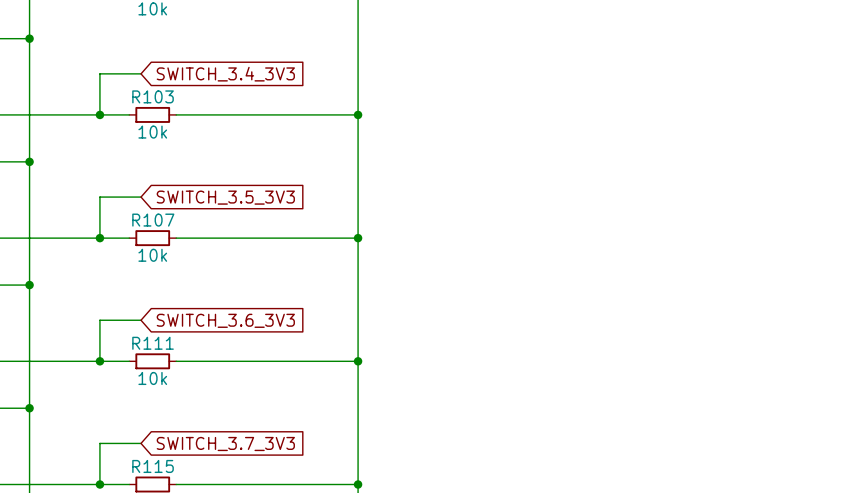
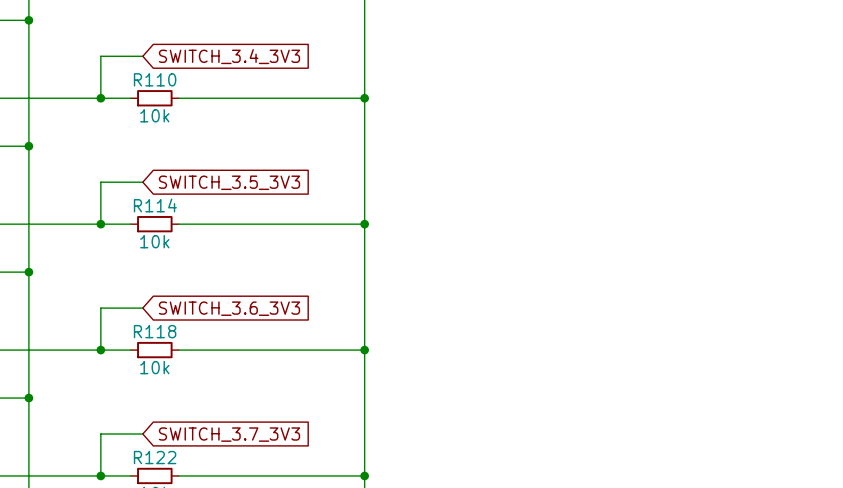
R103 name: R103 (153, 96) -> R110 (155, 79)
R107 name: R107 (153, 220) -> R114 (155, 205)
R111 name: R111 (153, 343) -> R118 (155, 331)
R115 name: R115 (153, 466) -> R122 (155, 457)

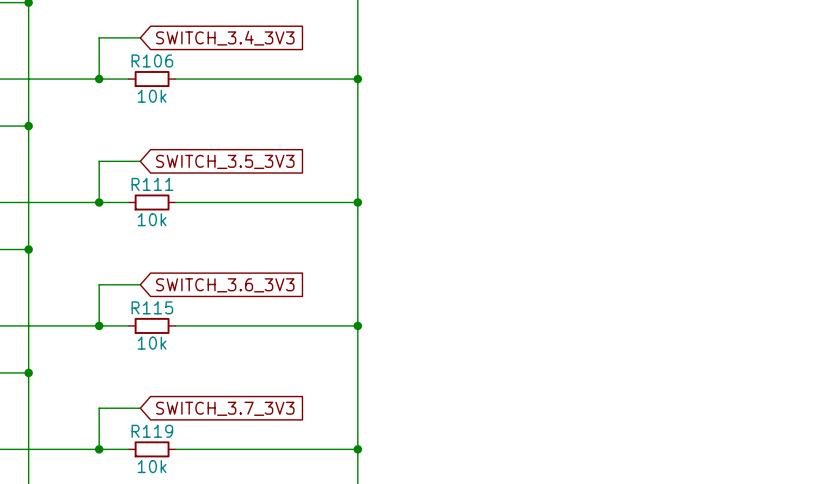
R110 name: R110 (155, 79) -> R106 (152, 60)
R114 name: R114 (155, 205) -> R111 (152, 184)
R118 name: R118 (155, 331) -> R115 (152, 307)
R122 name: R122 (155, 457) -> R119 (152, 431)

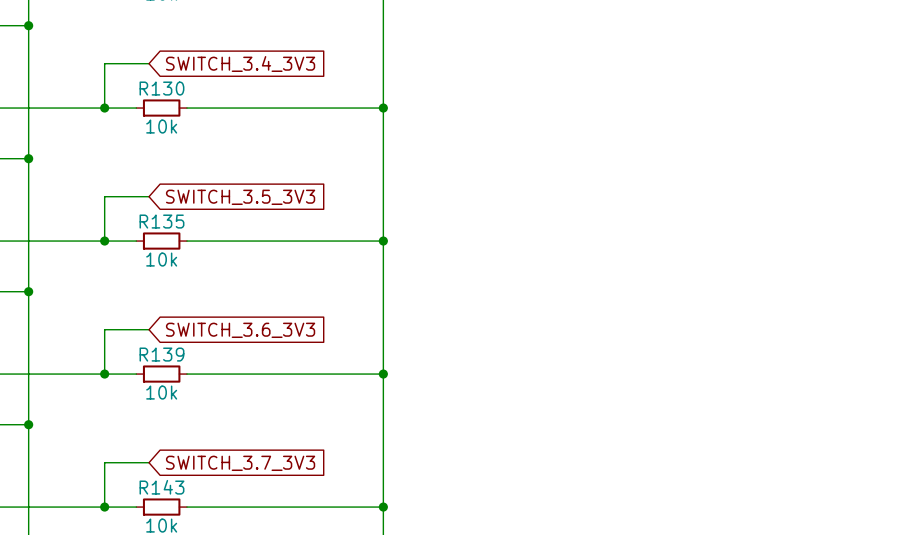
R106 name: R106 (152, 60) -> R130 (161, 88)
R111 name: R111 (152, 184) -> R135 (161, 221)
R115 name: R115 (152, 307) -> R139 (161, 354)
R119 name: R119 (152, 431) -> R143 (161, 487)

